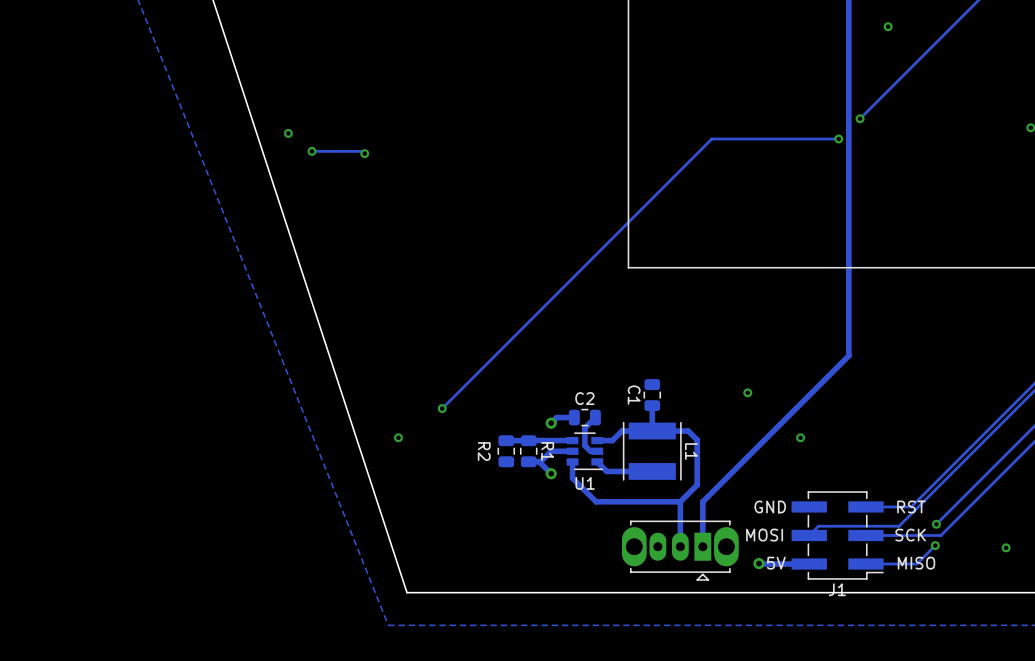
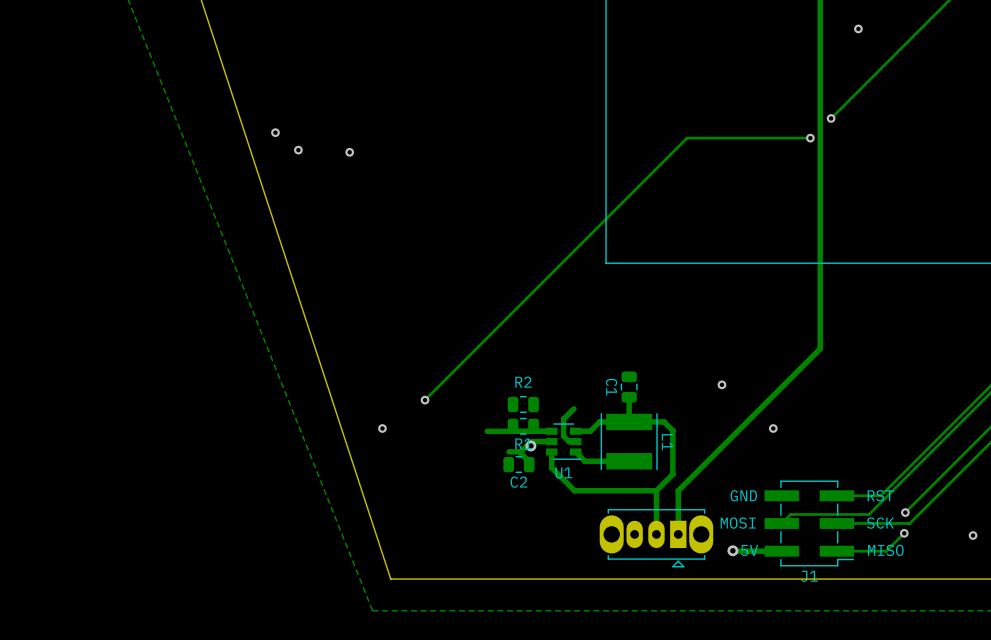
track: (362, 151) (311, 151) -> none
C2 name position: C2 (584, 398) -> C2 (518, 482)
track: (574, 417) (556, 417) (551, 423) -> none
C2 position: (584, 417) -> (518, 464)
via: (551, 423) -> none
R2 rotation: 0° (506, 451) -> 90° clockwise (523, 404)
R2 position: (506, 451) -> (523, 404)
R1 rotation: 0° (528, 451) -> 90° clockwise (523, 426)
R1 position: (528, 451) -> (523, 426)
via: none -> (530, 445)
via: (551, 473) -> none

